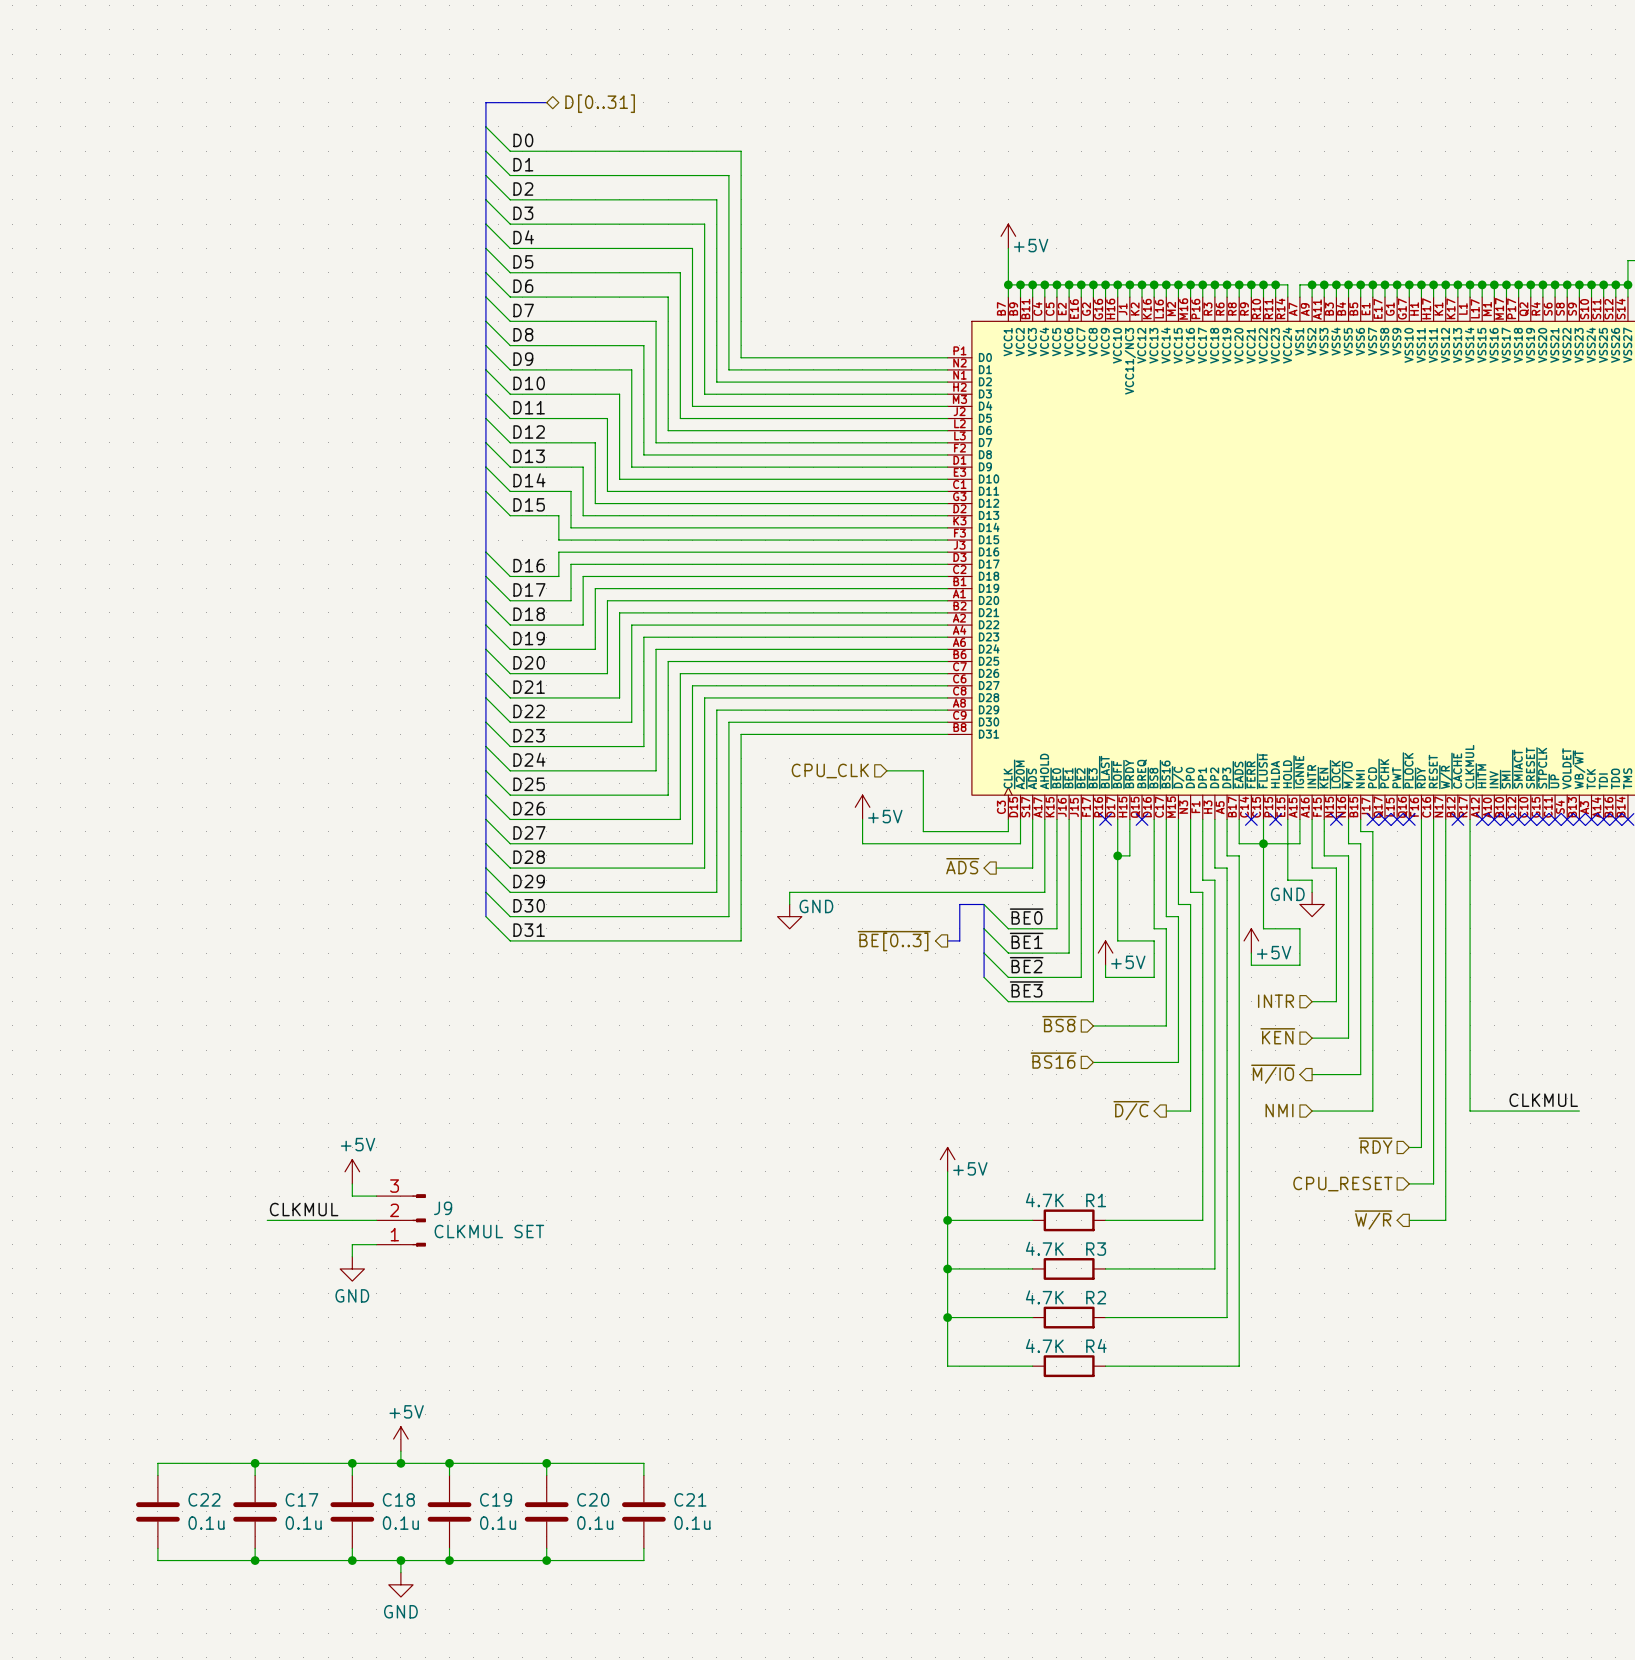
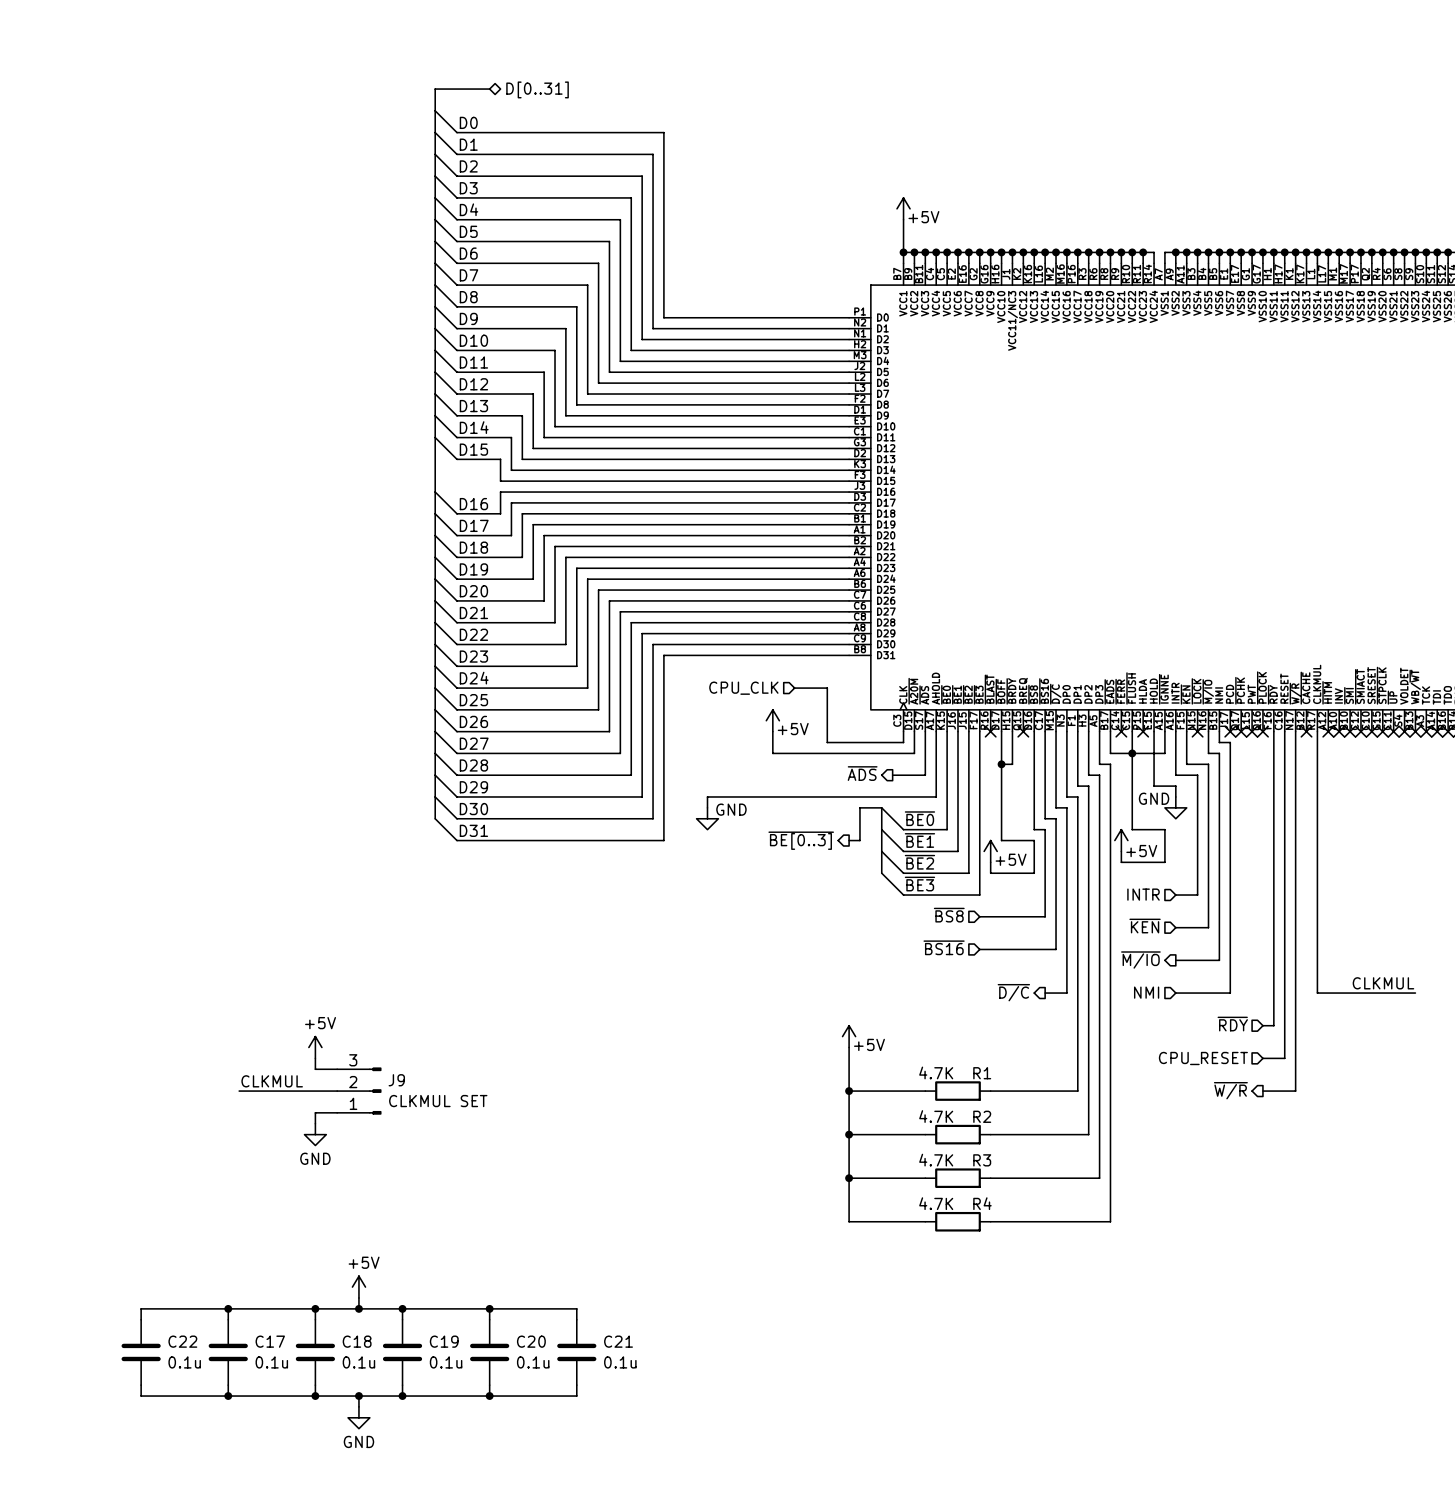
R3 name: R3 (1096, 1249) -> R2 (982, 1116)
R2 name: R2 (1096, 1297) -> R3 (982, 1160)

